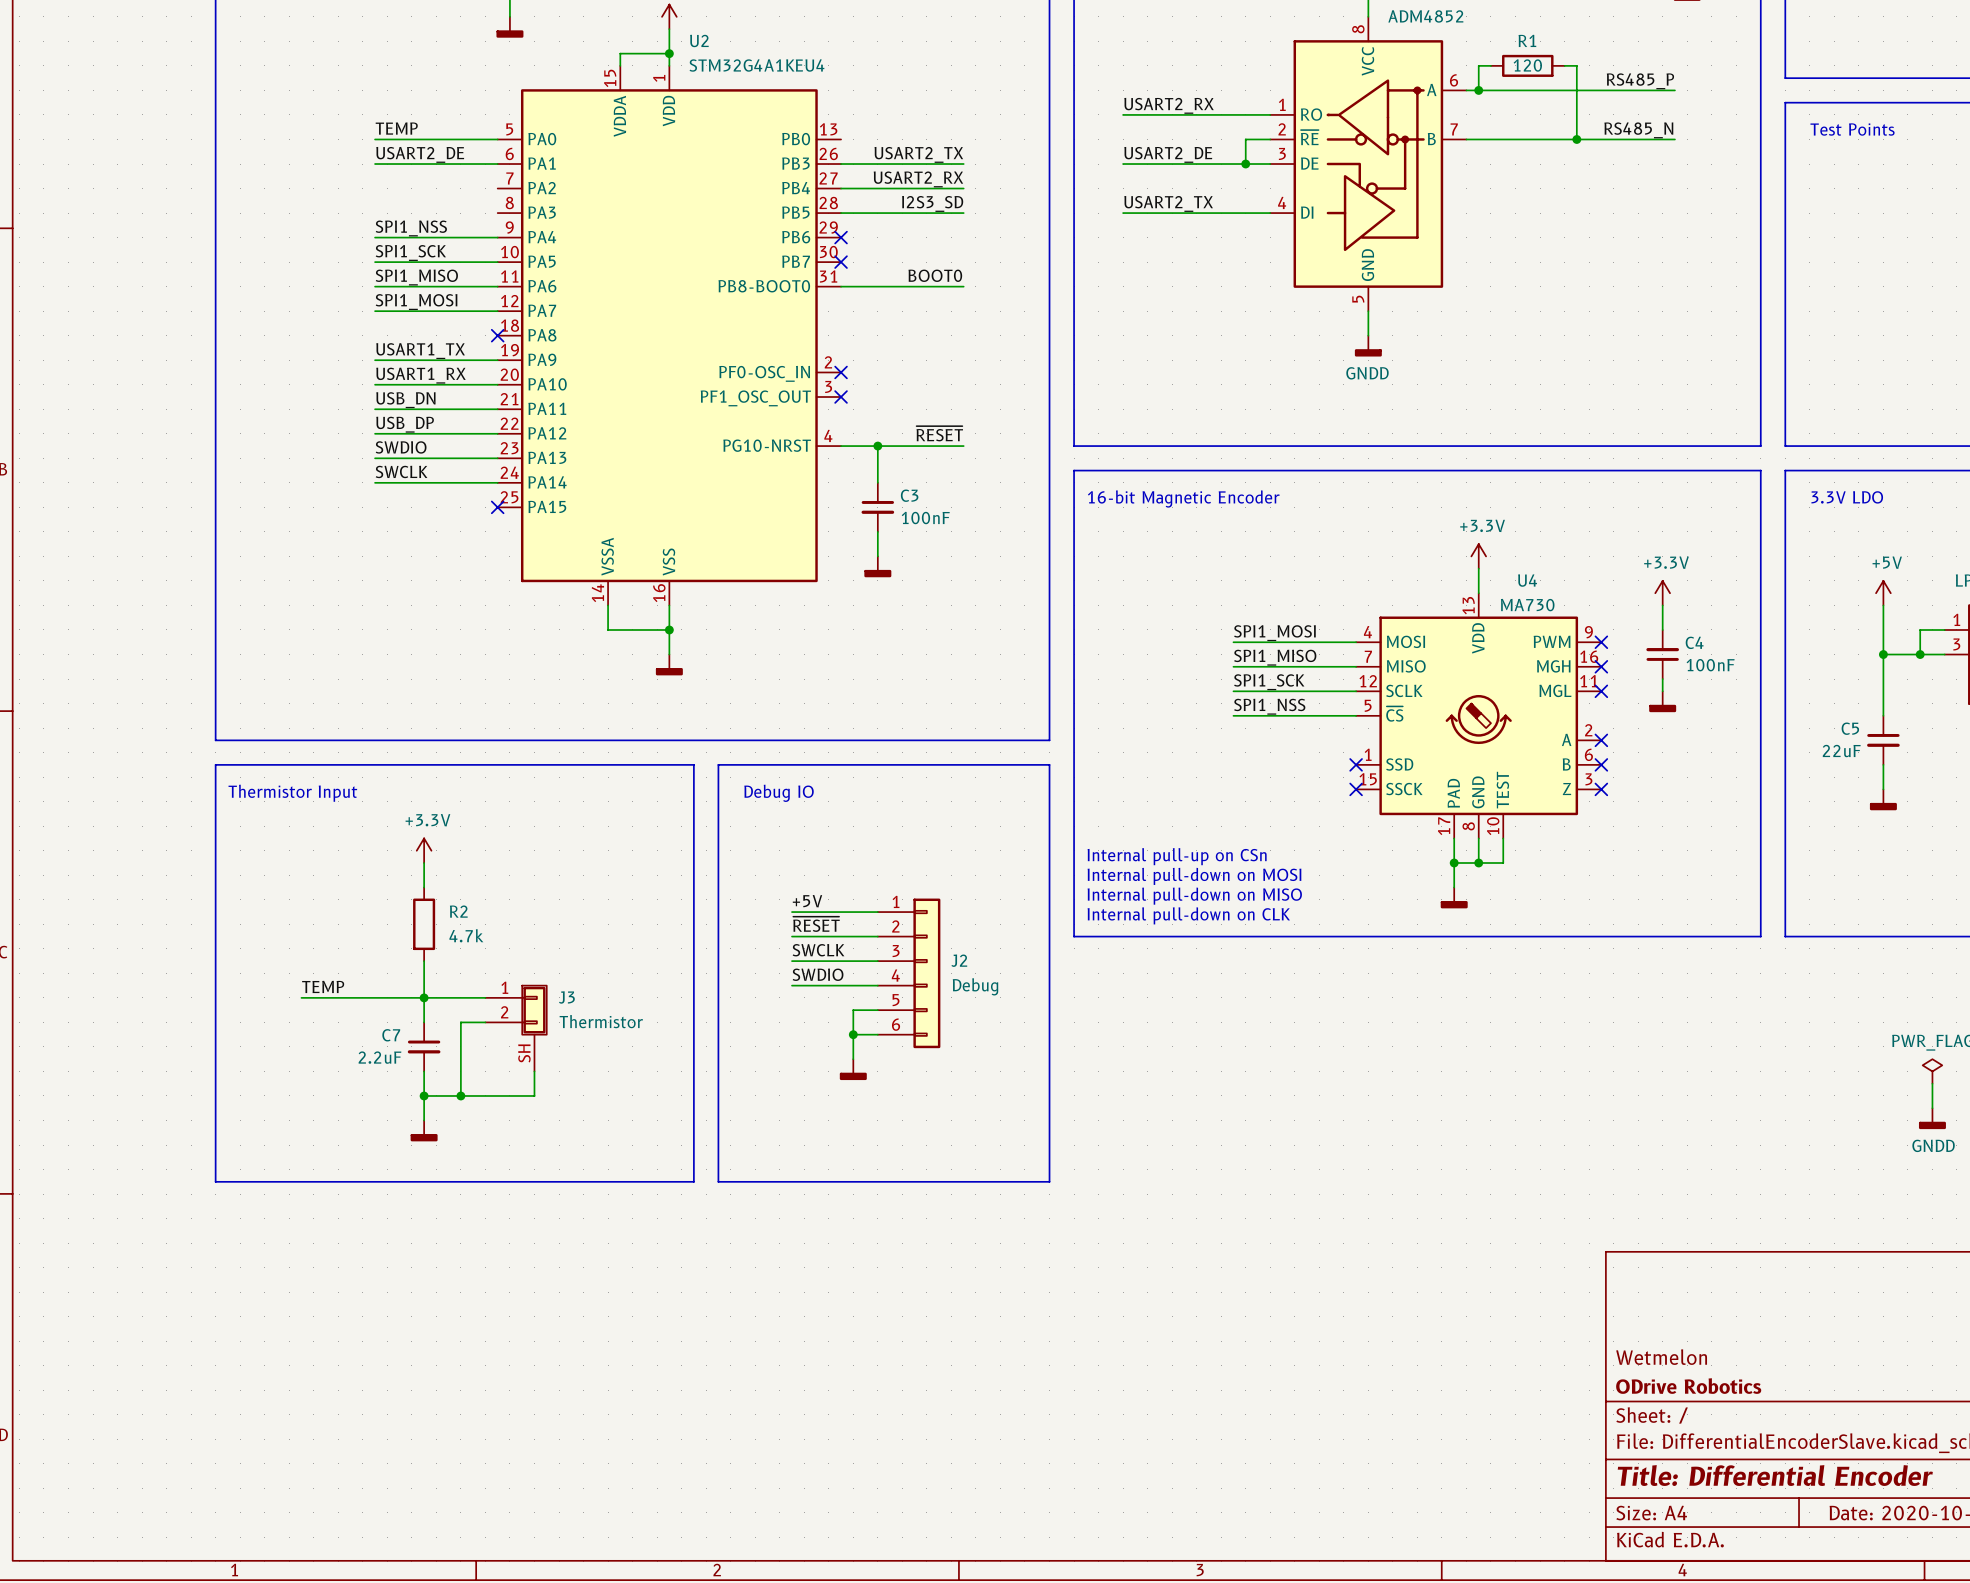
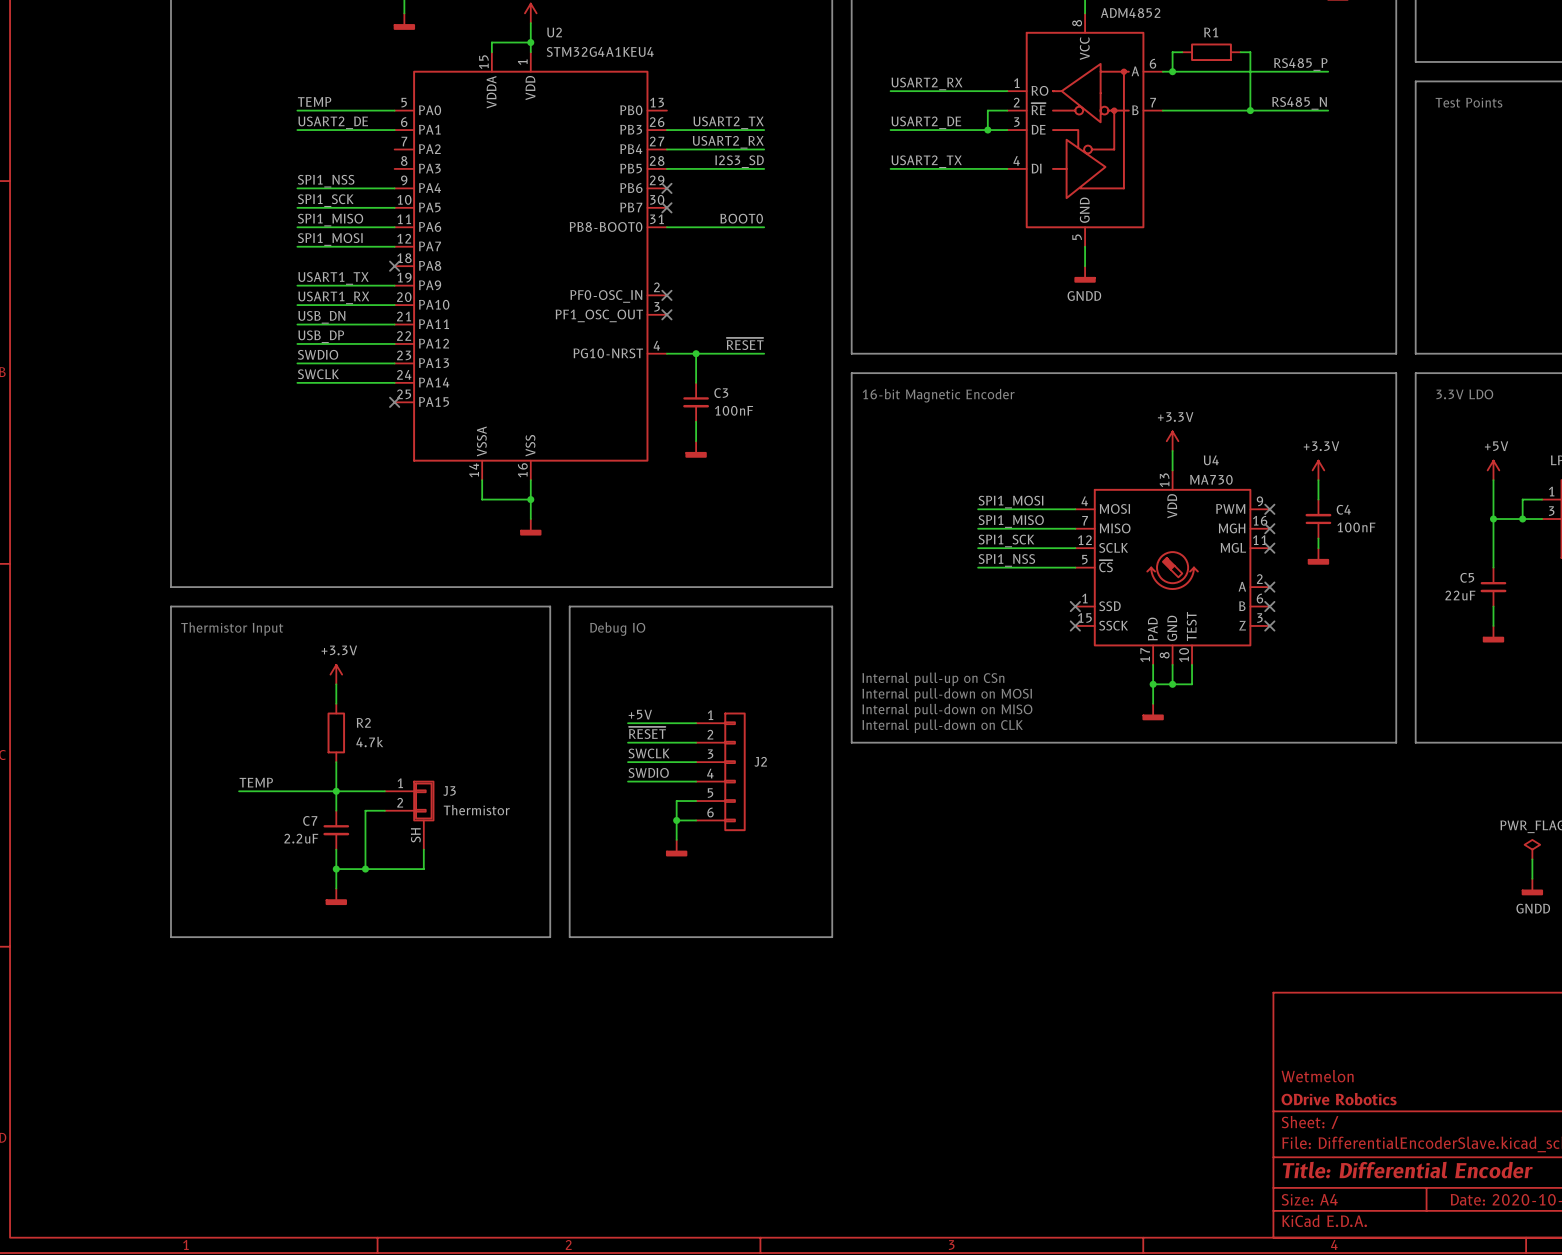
R1 value: 120 (1527, 65) -> none
J2 value: Debug (975, 986) -> none

